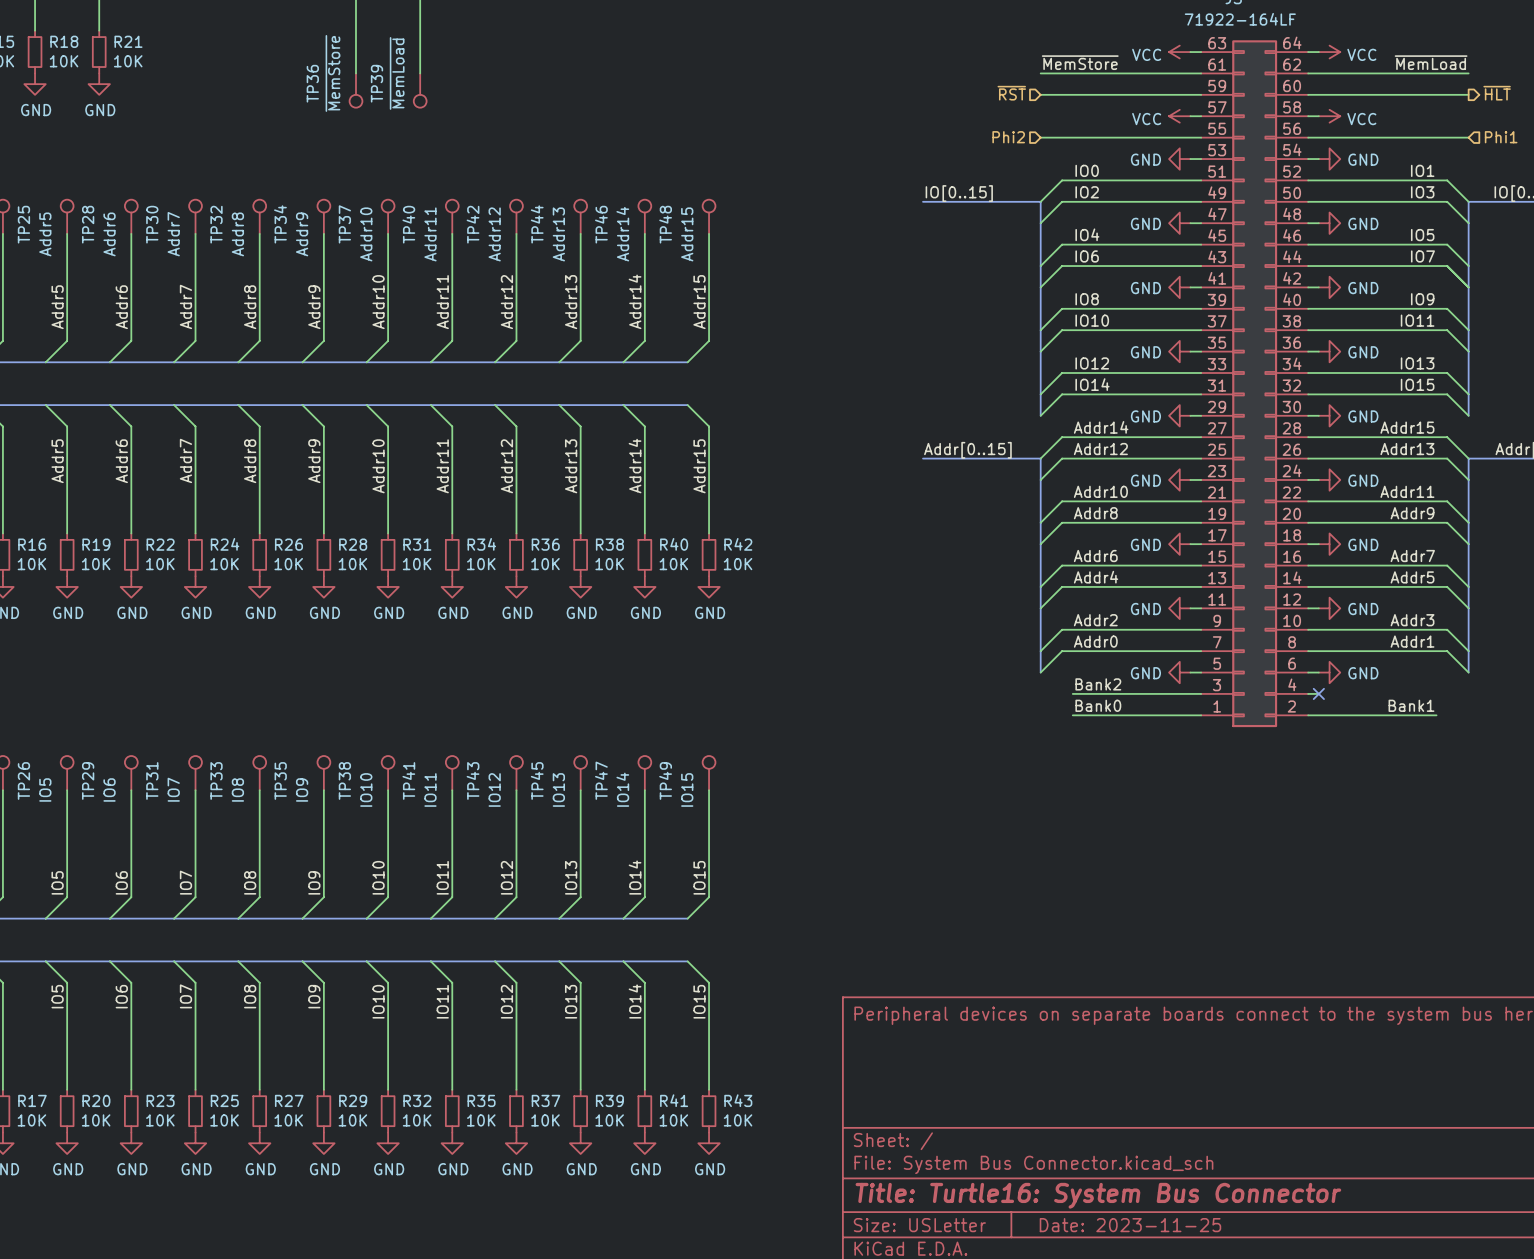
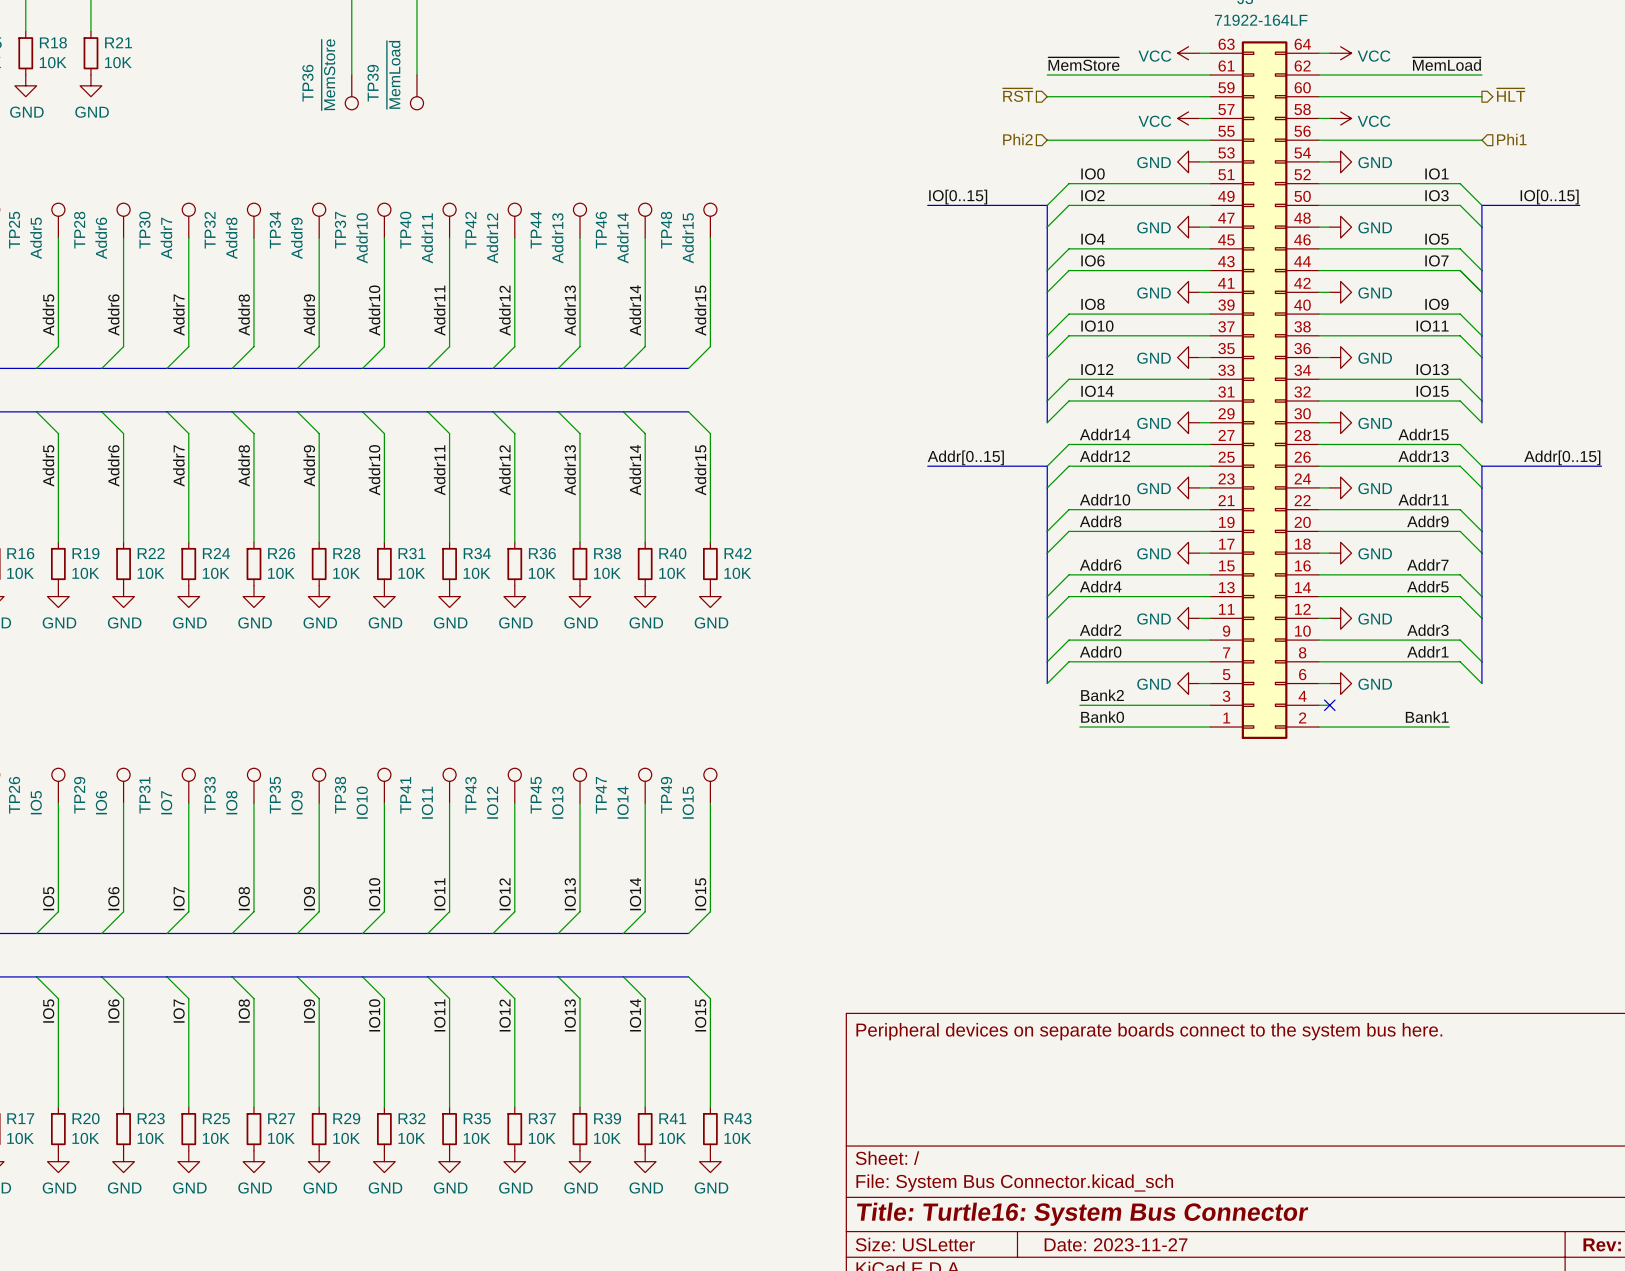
title block: Date: 2023-11-25 (1130, 1225) -> Date: 2023-11-27 (1116, 1244)

